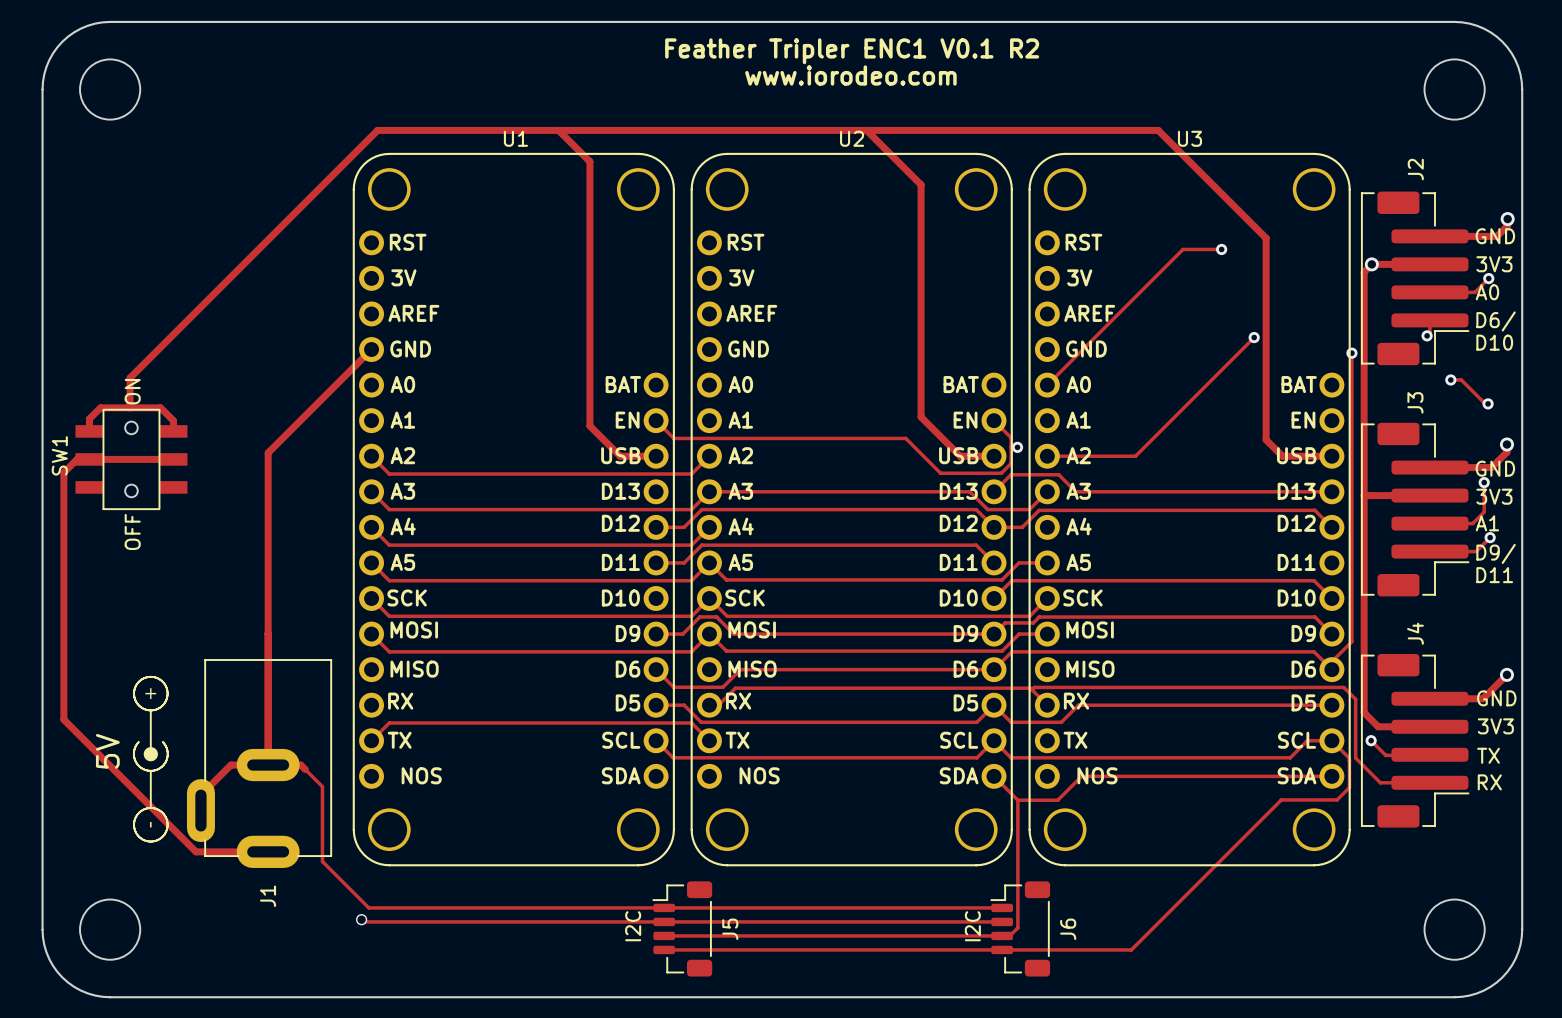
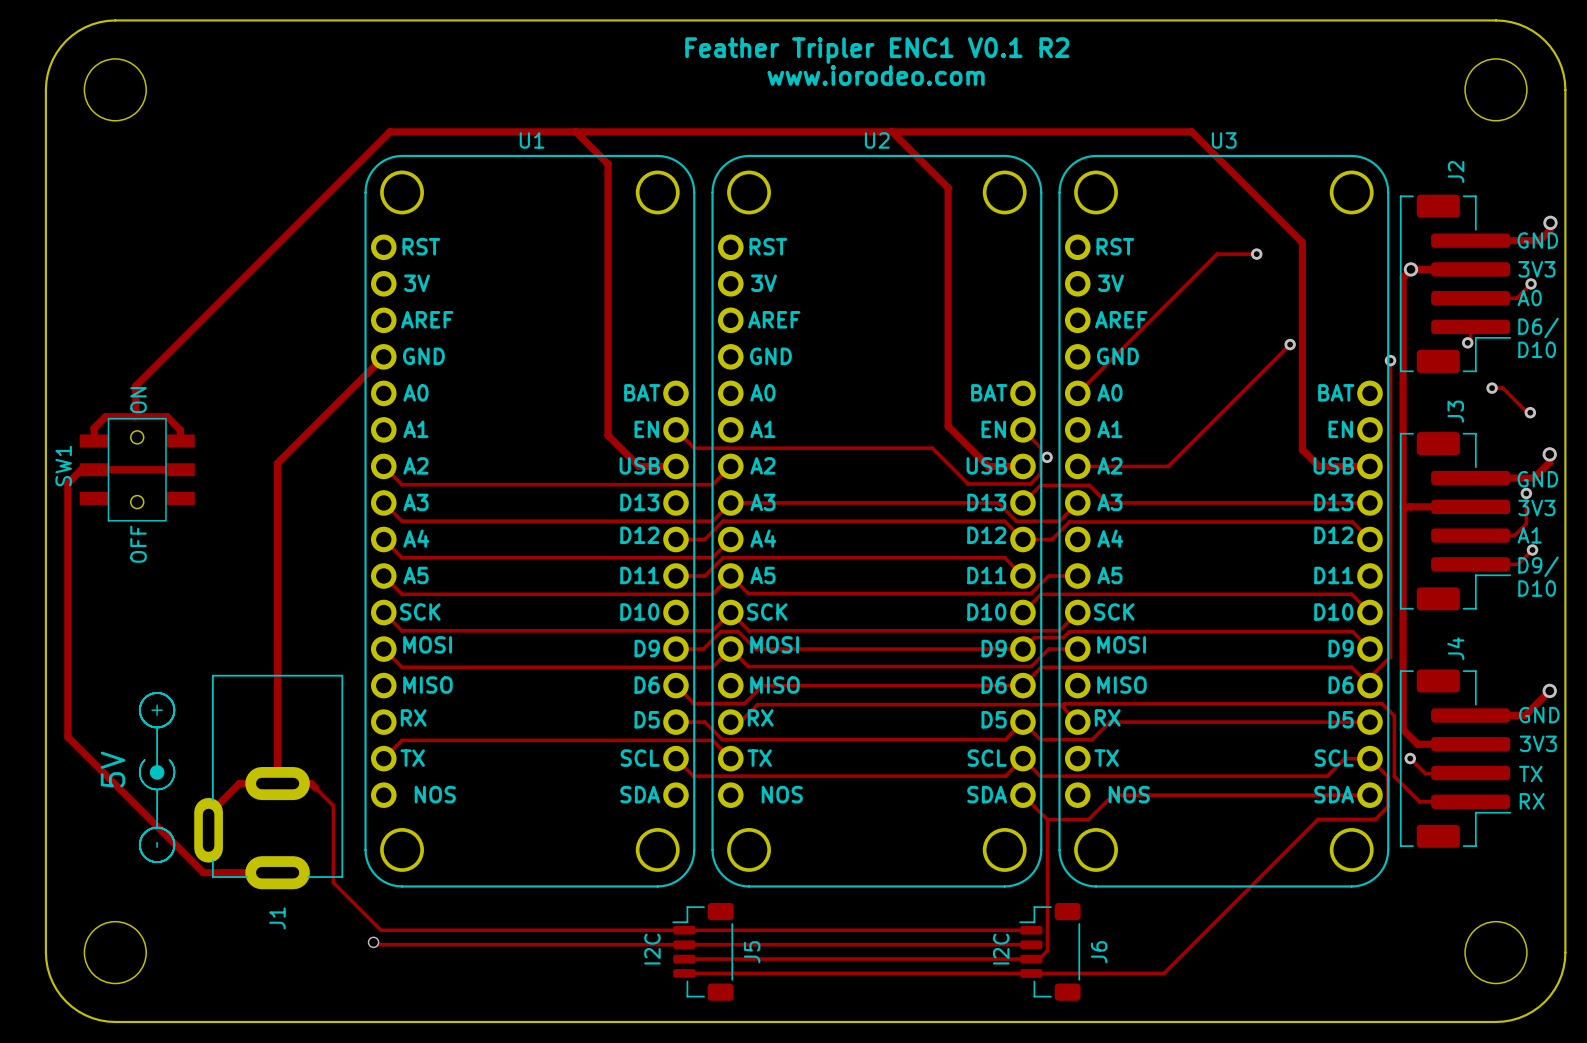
text: D11 (1494, 575) -> D10 (1537, 588)

